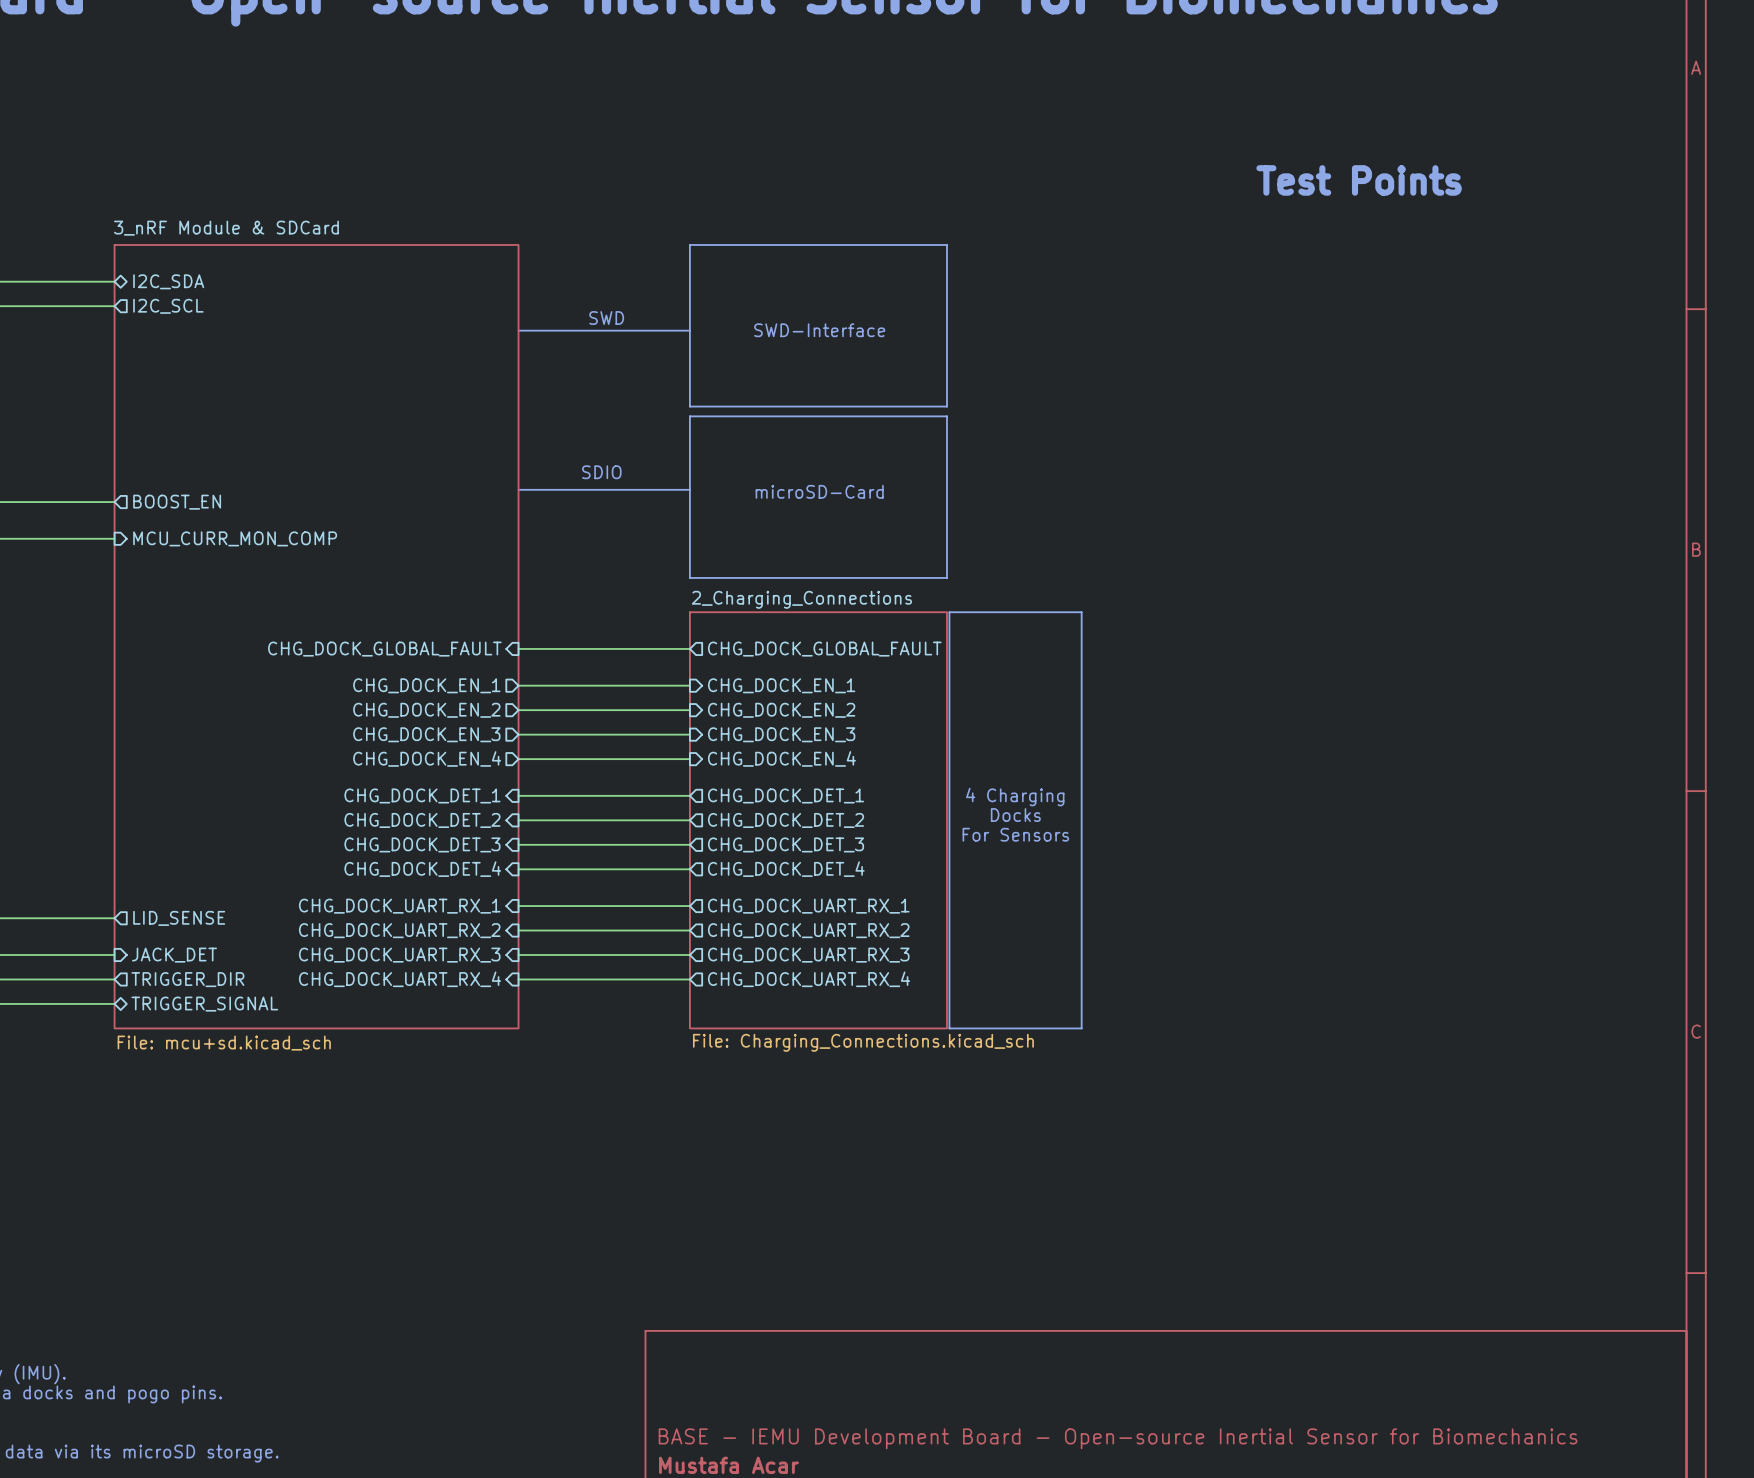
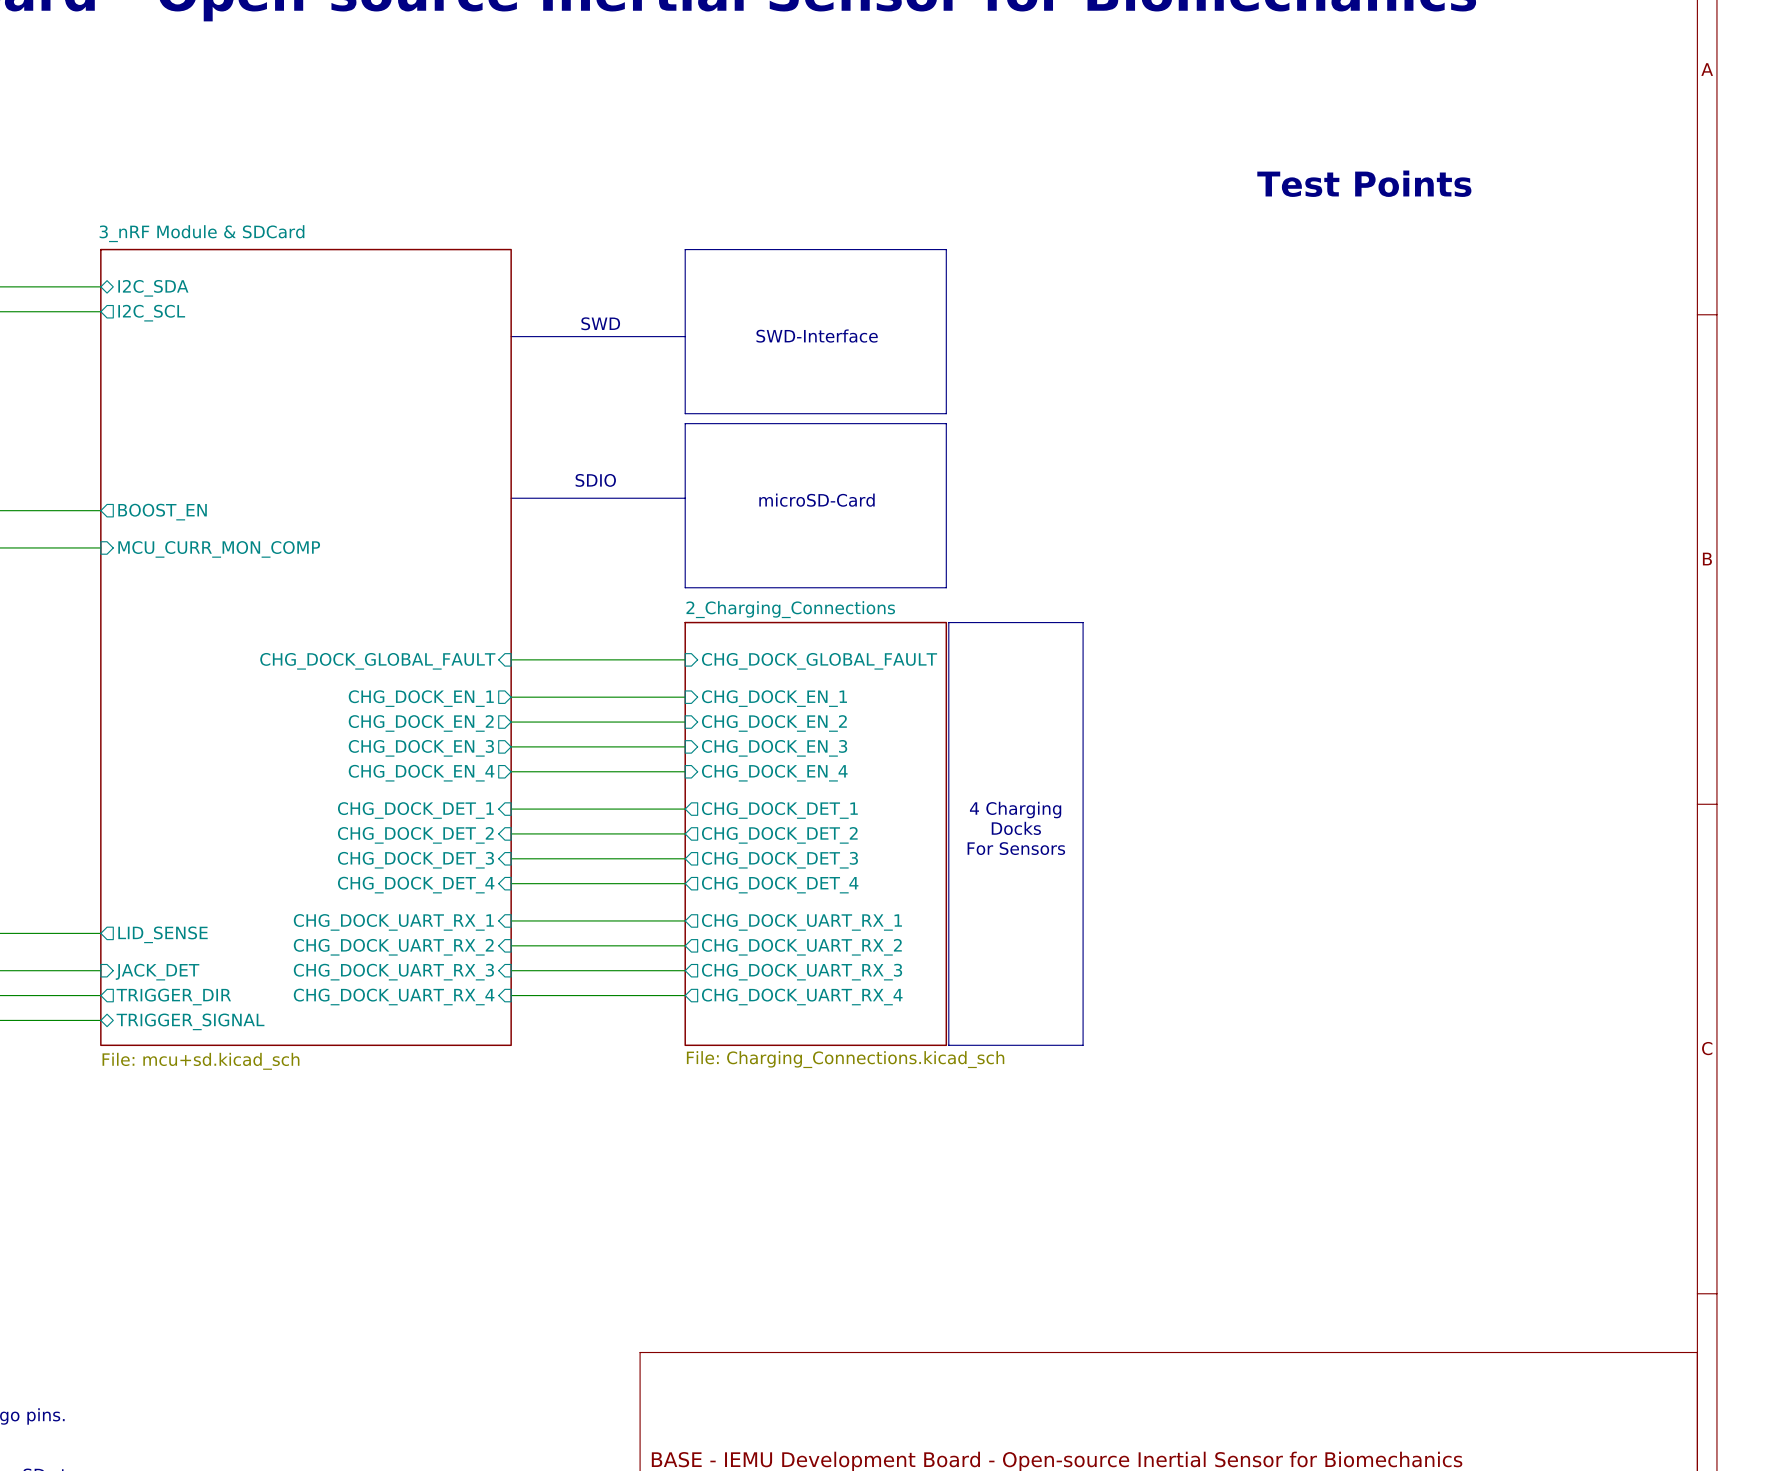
sheet pin shape: output (824, 649) -> input (819, 661)

